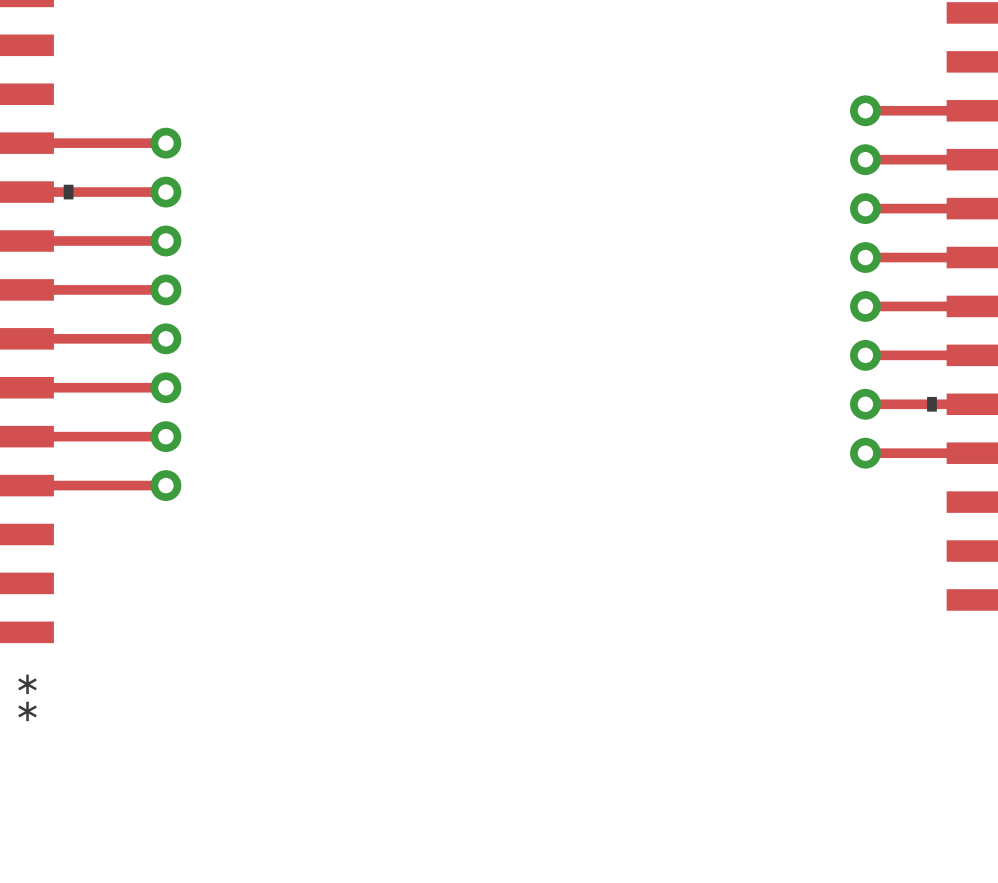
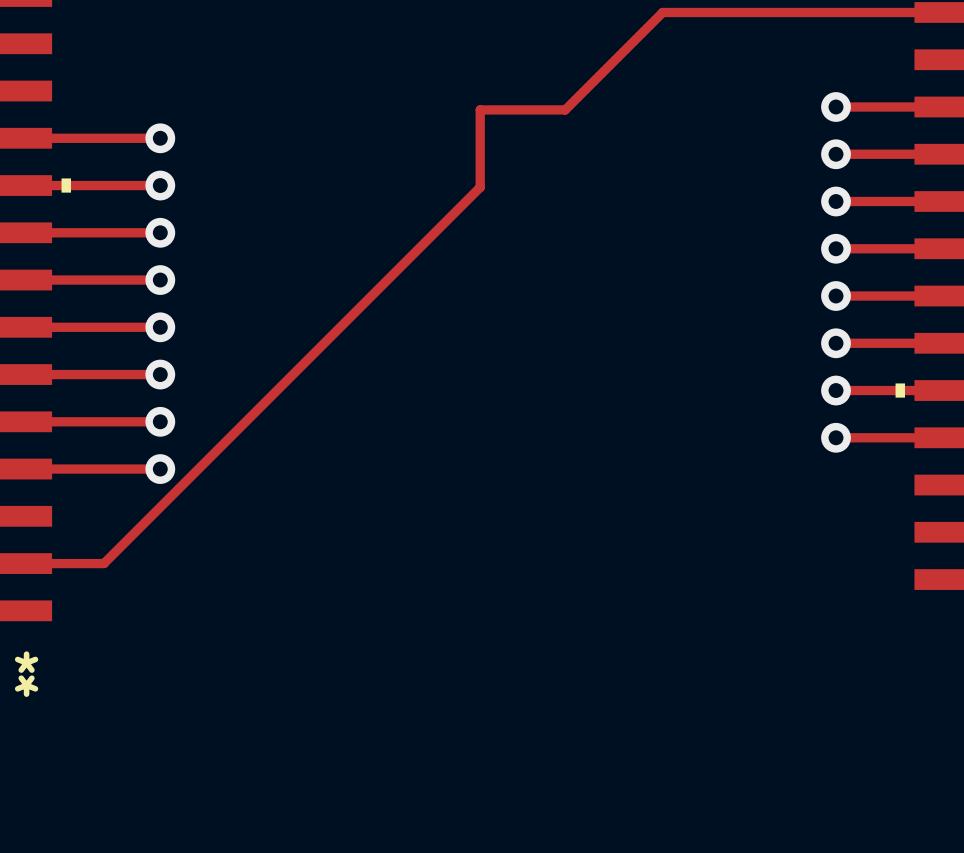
track: none -> (949, 12) (662, 12) (565, 109) (480, 109) (480, 187) (103, 563) (17, 563)

